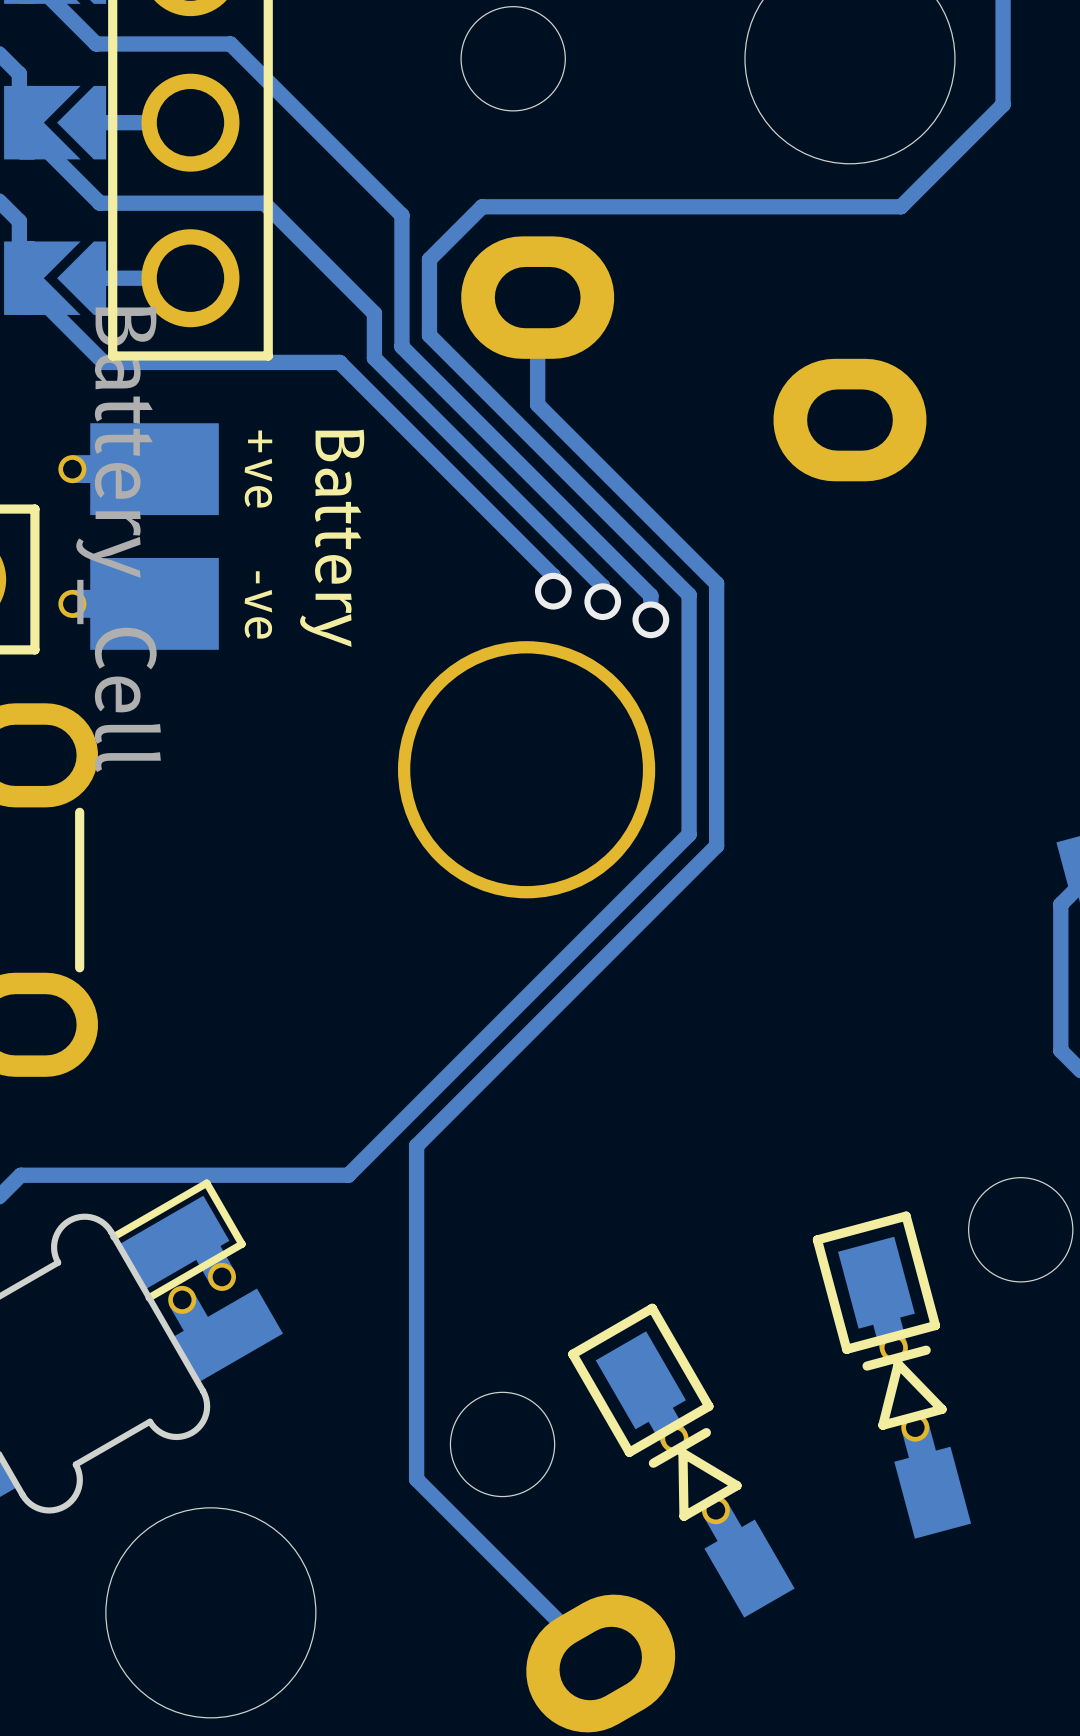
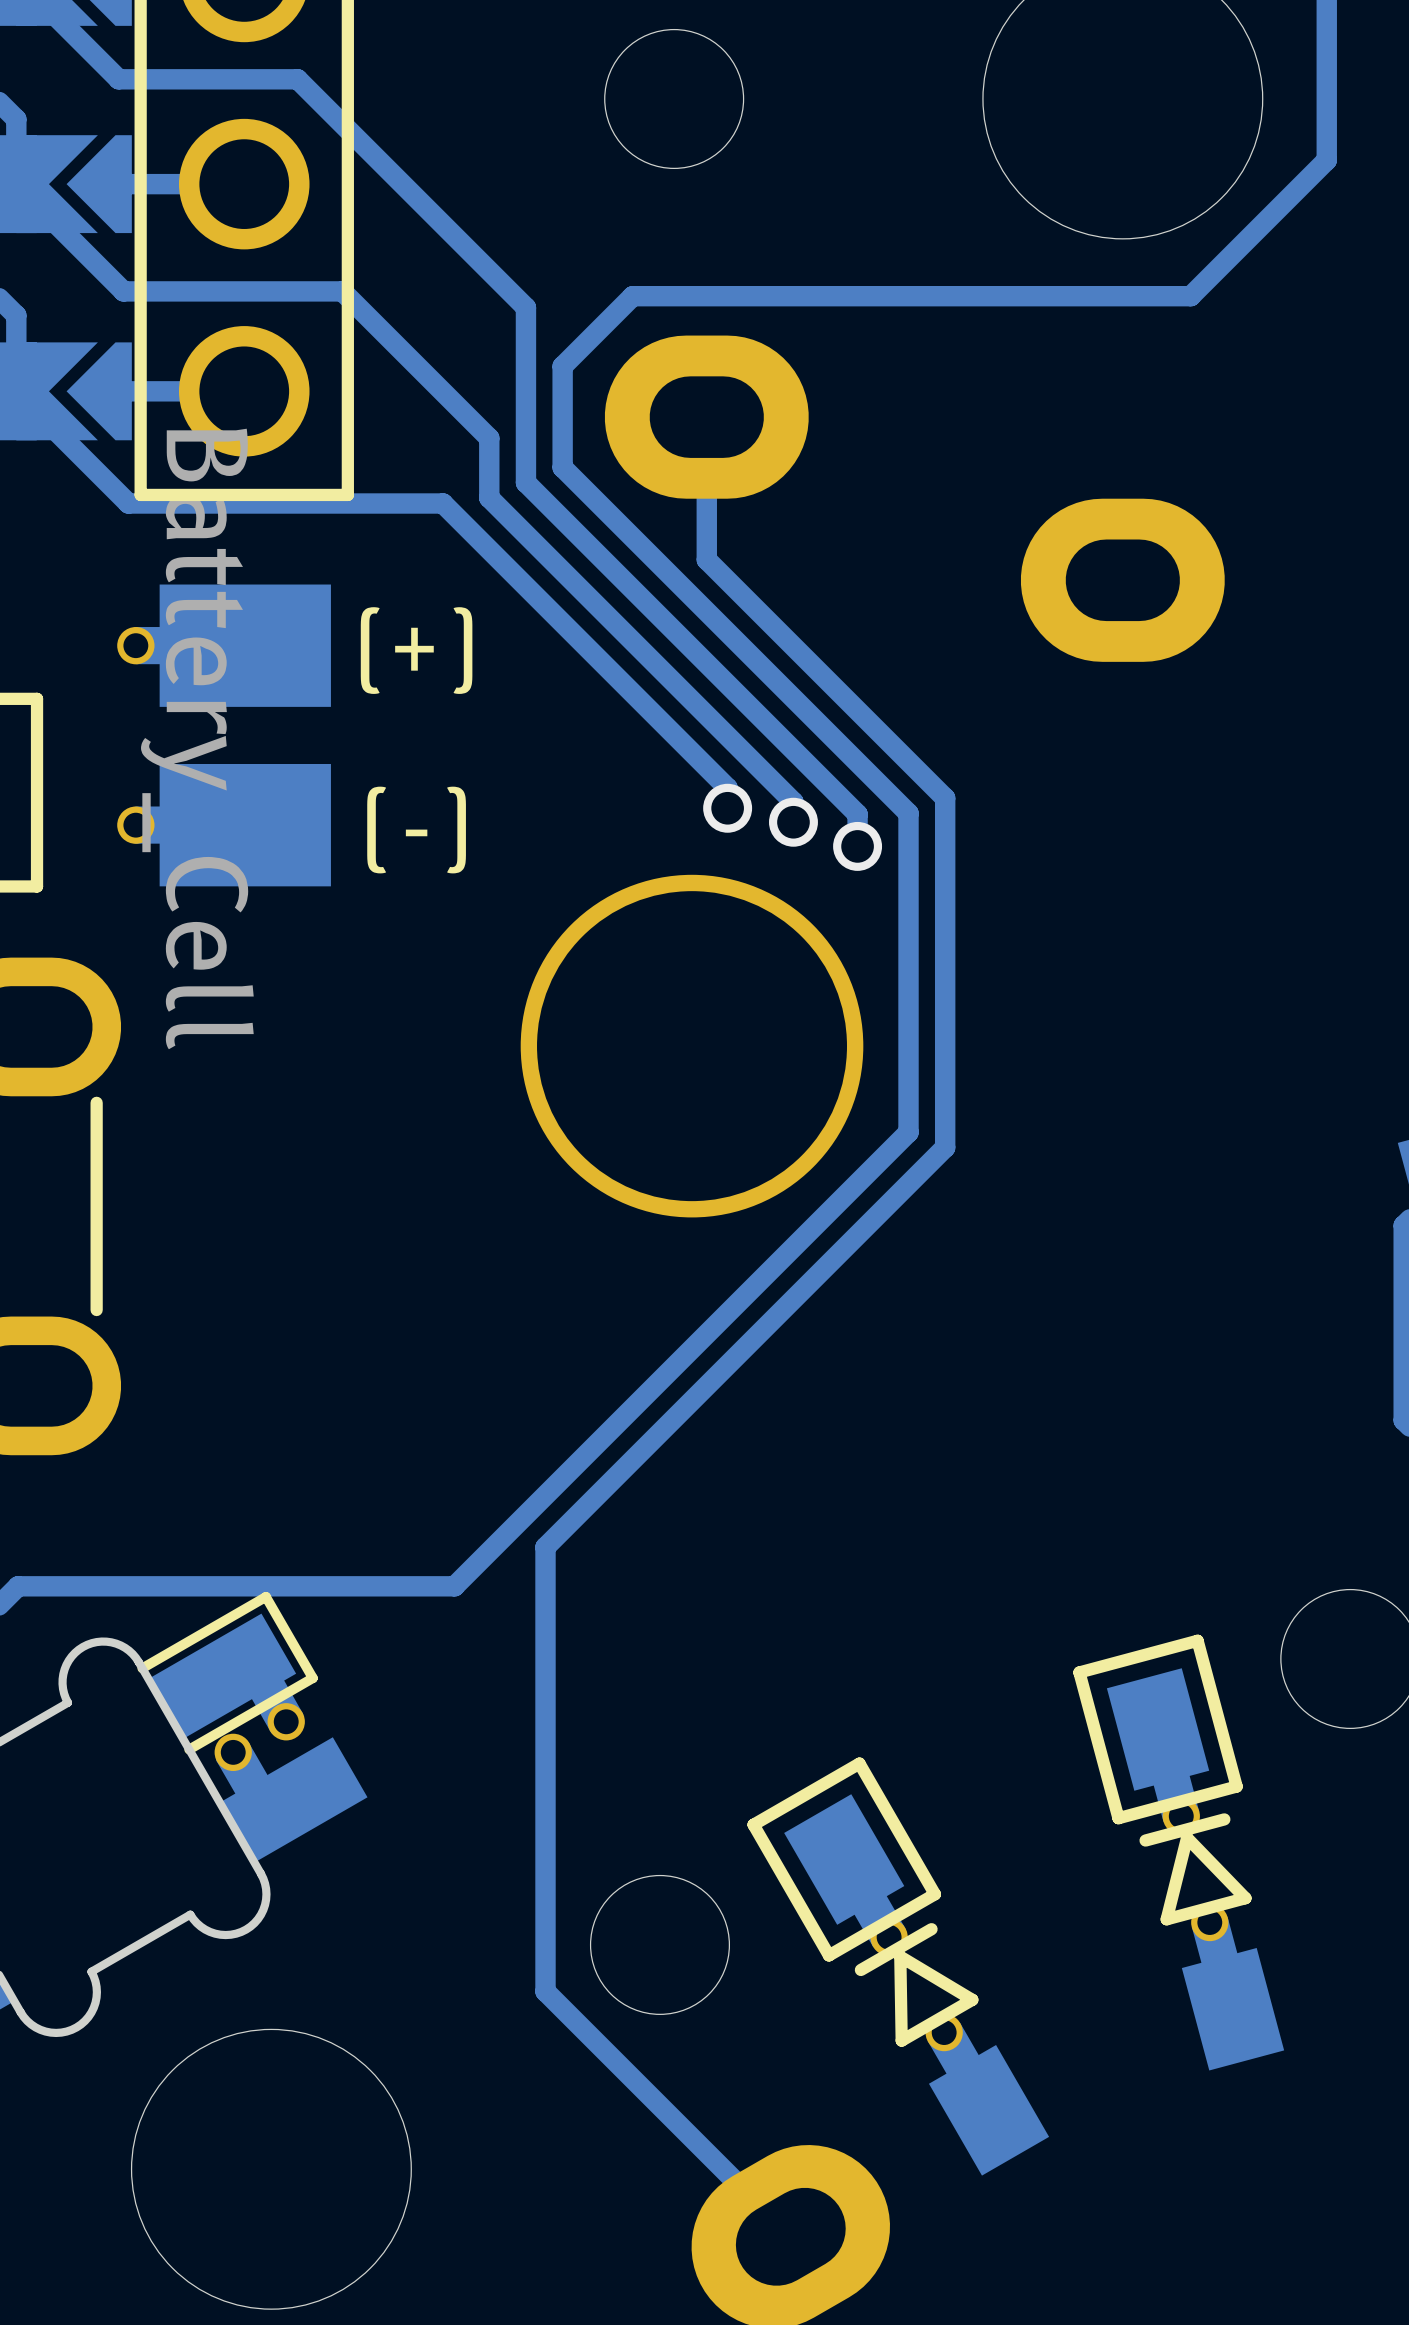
part text: +ve (258, 469) -> none
part text: none -> (+) (416, 650)
part position: (138, 536) -> (224, 735)
part text: Battery (332, 538) -> none
part text: -ve (258, 604) -> none
part text: none -> (-) (416, 830)

